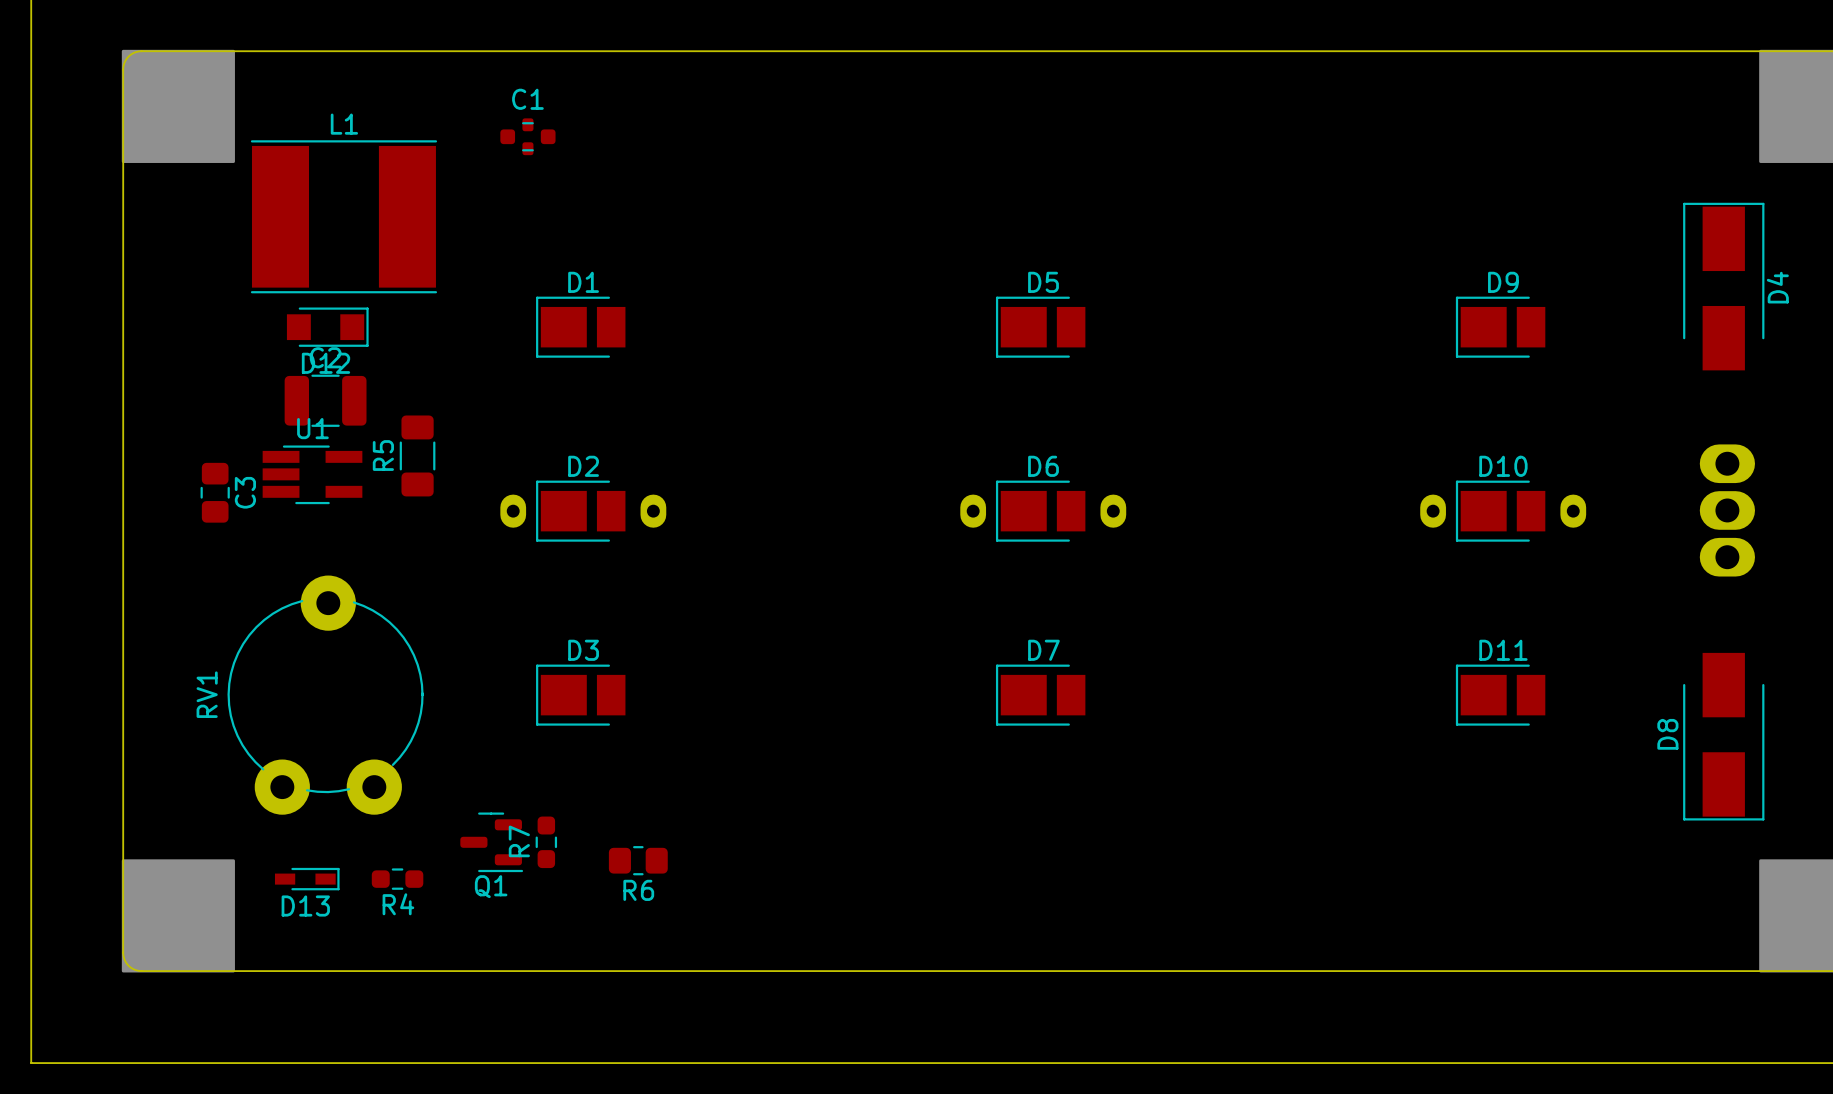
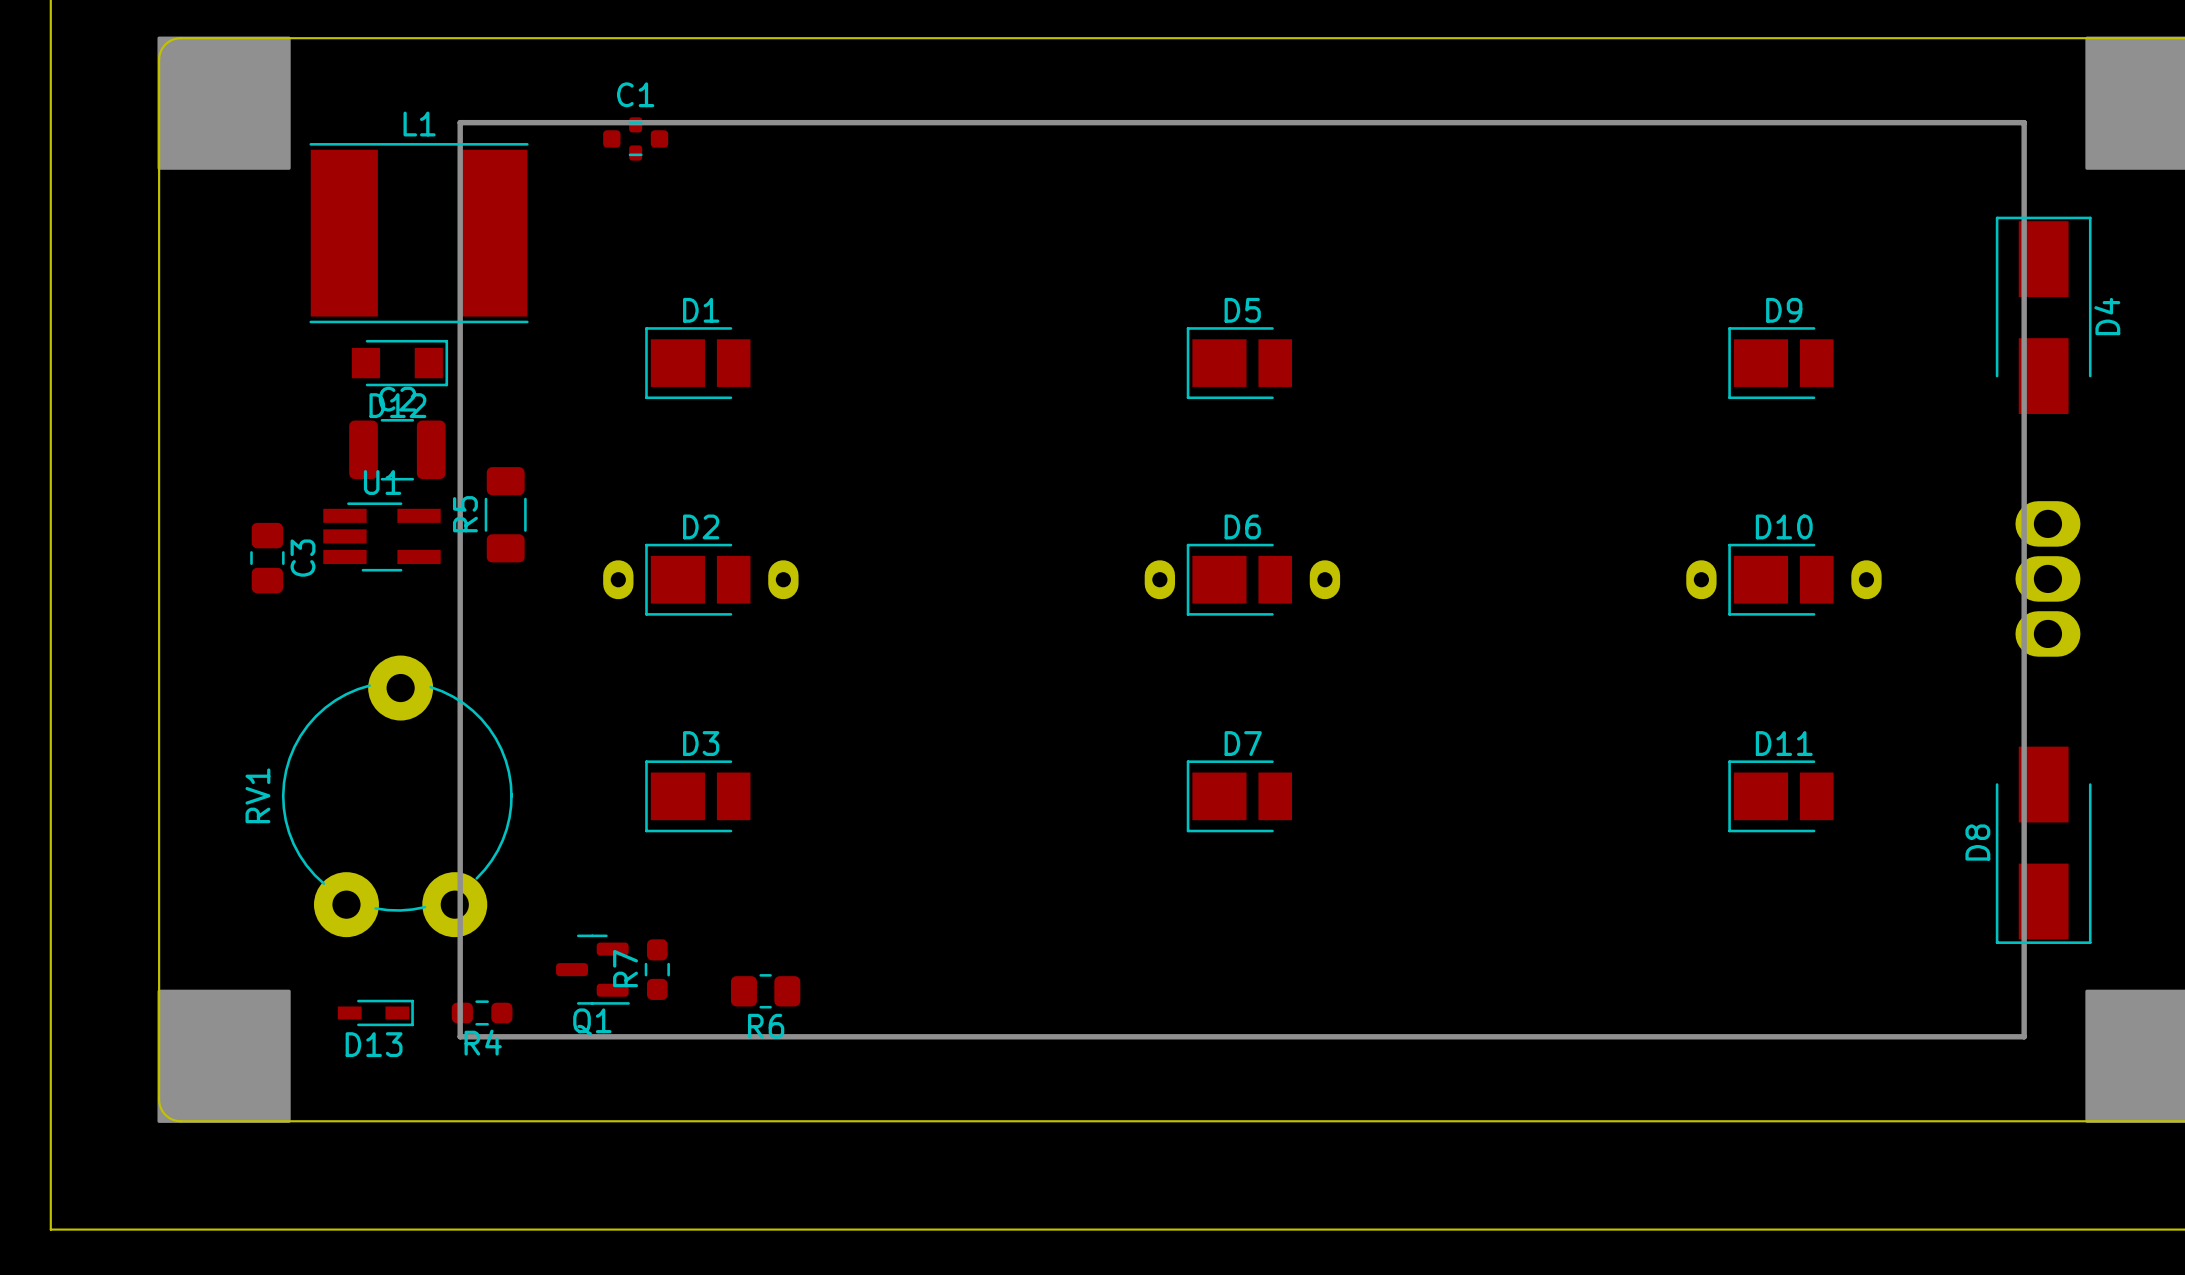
line: none -> (460, 122) (2024, 122) (2024, 1036) (460, 1036) (460, 122)

